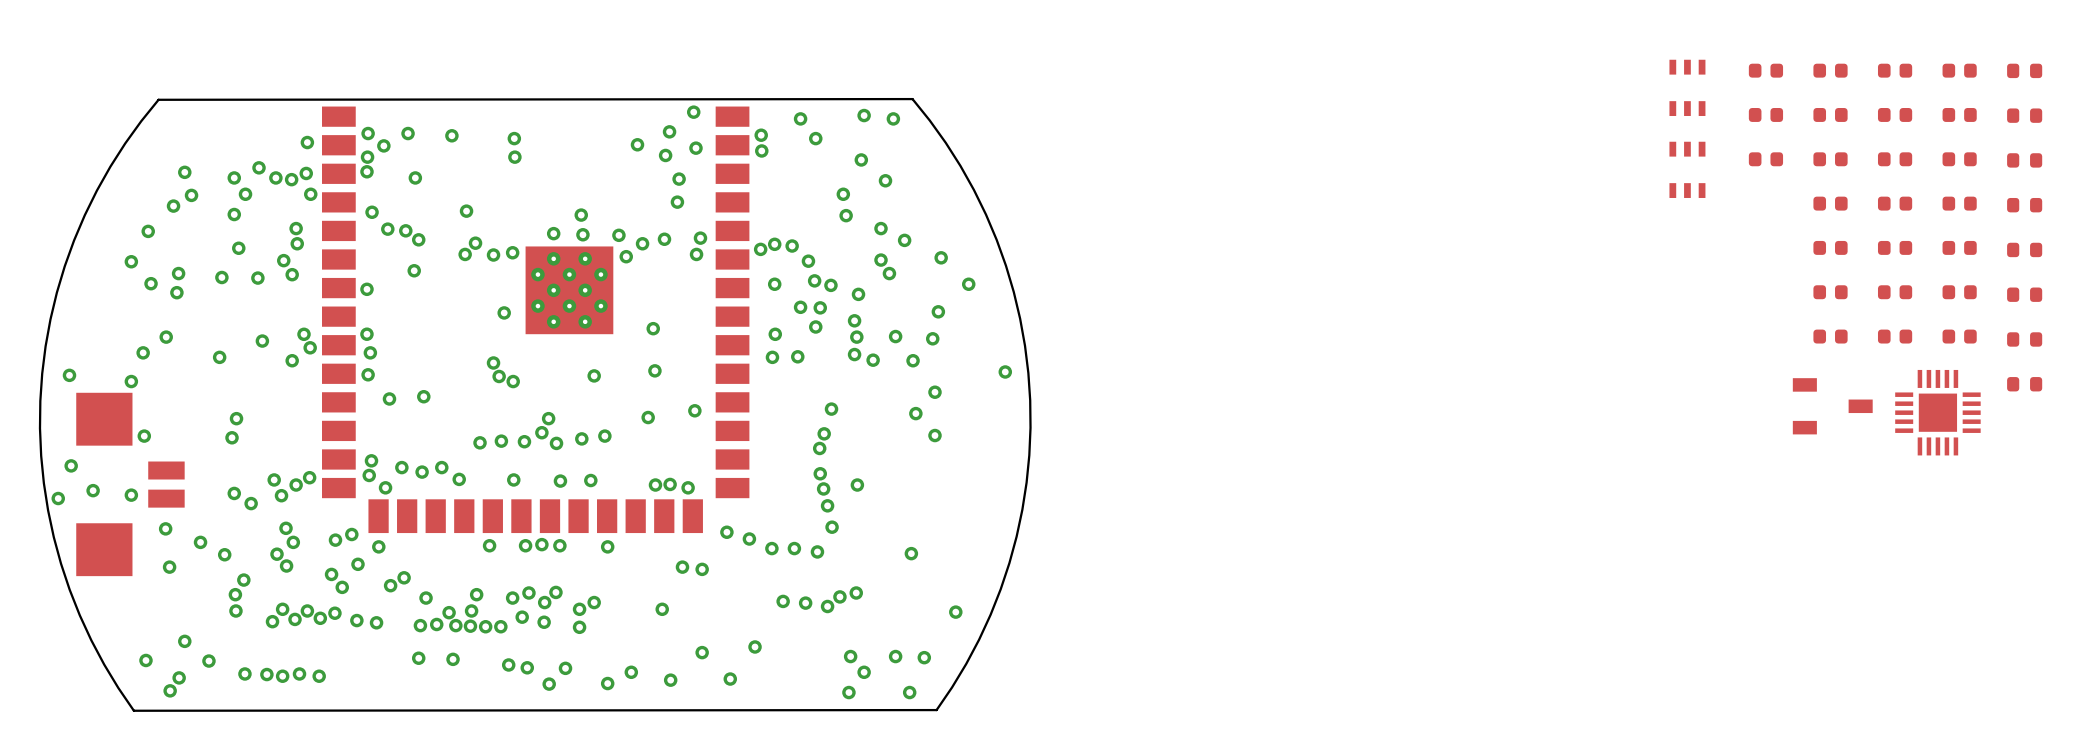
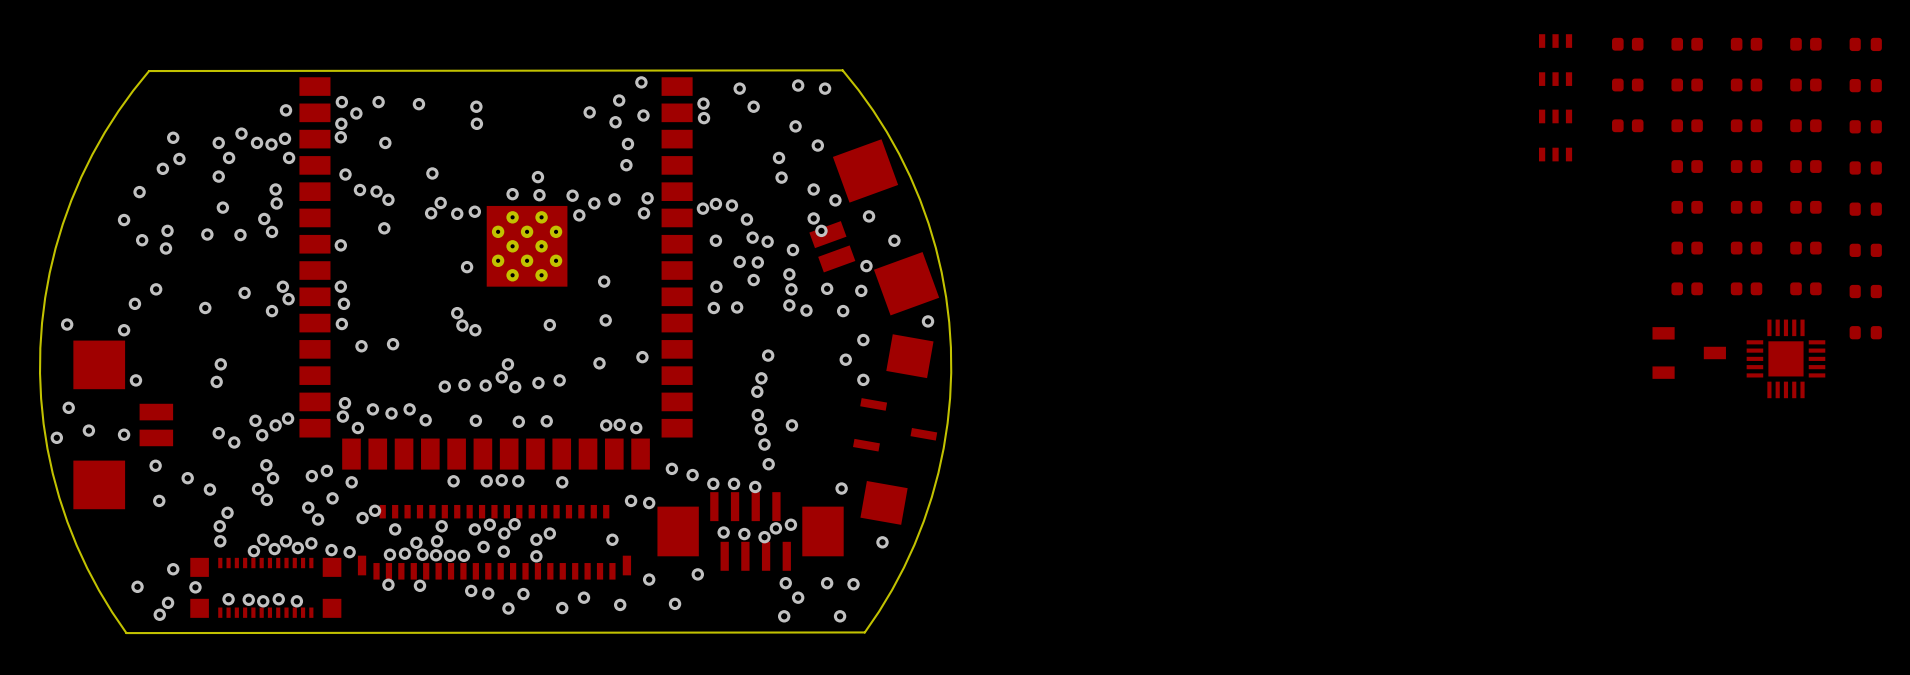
part: none -> (874, 227)
part: none -> (895, 429)
part: none -> (750, 531)
part: none -> (494, 542)
part: none -> (265, 587)

